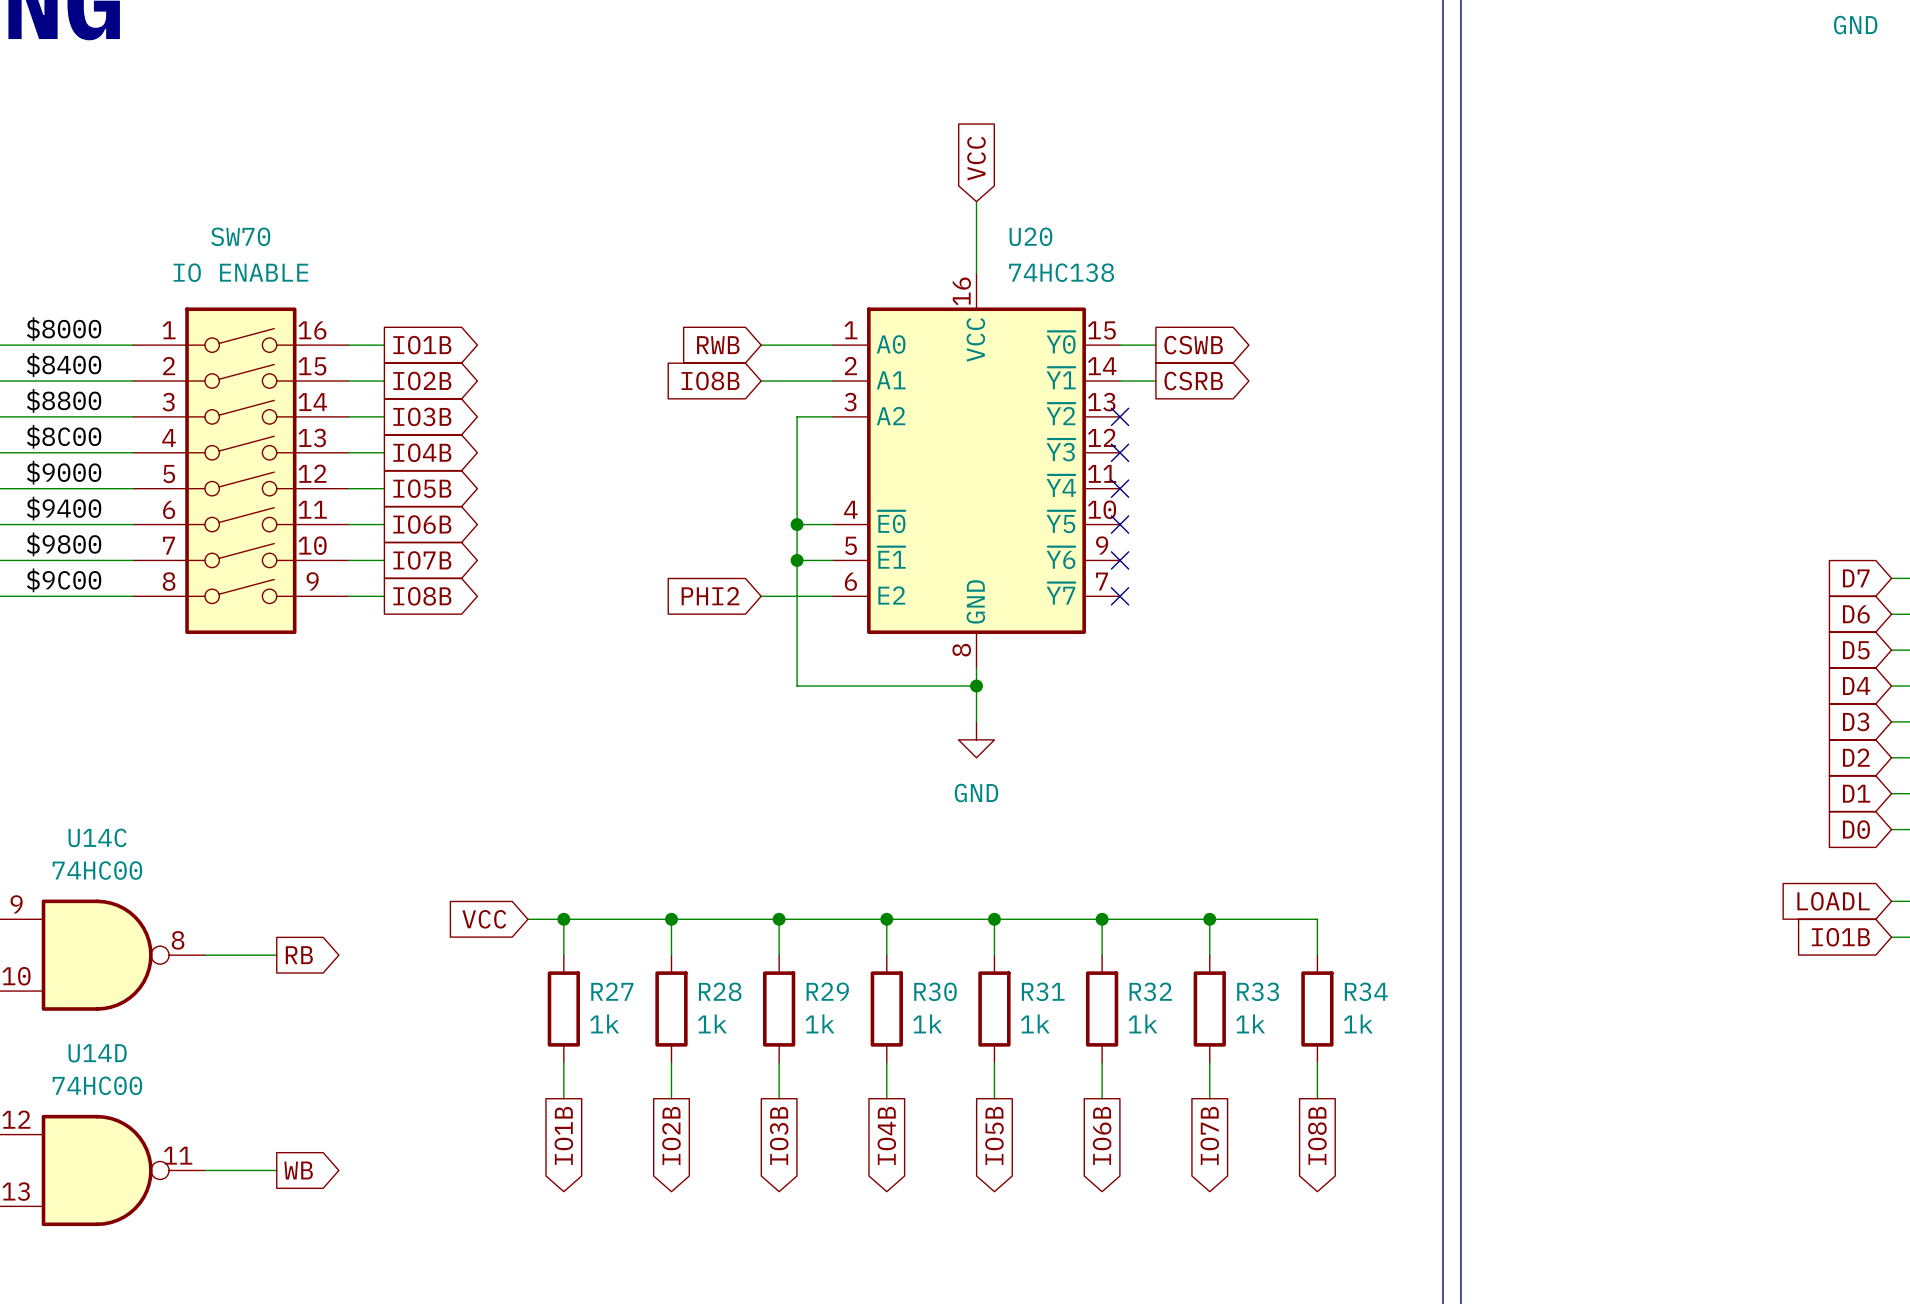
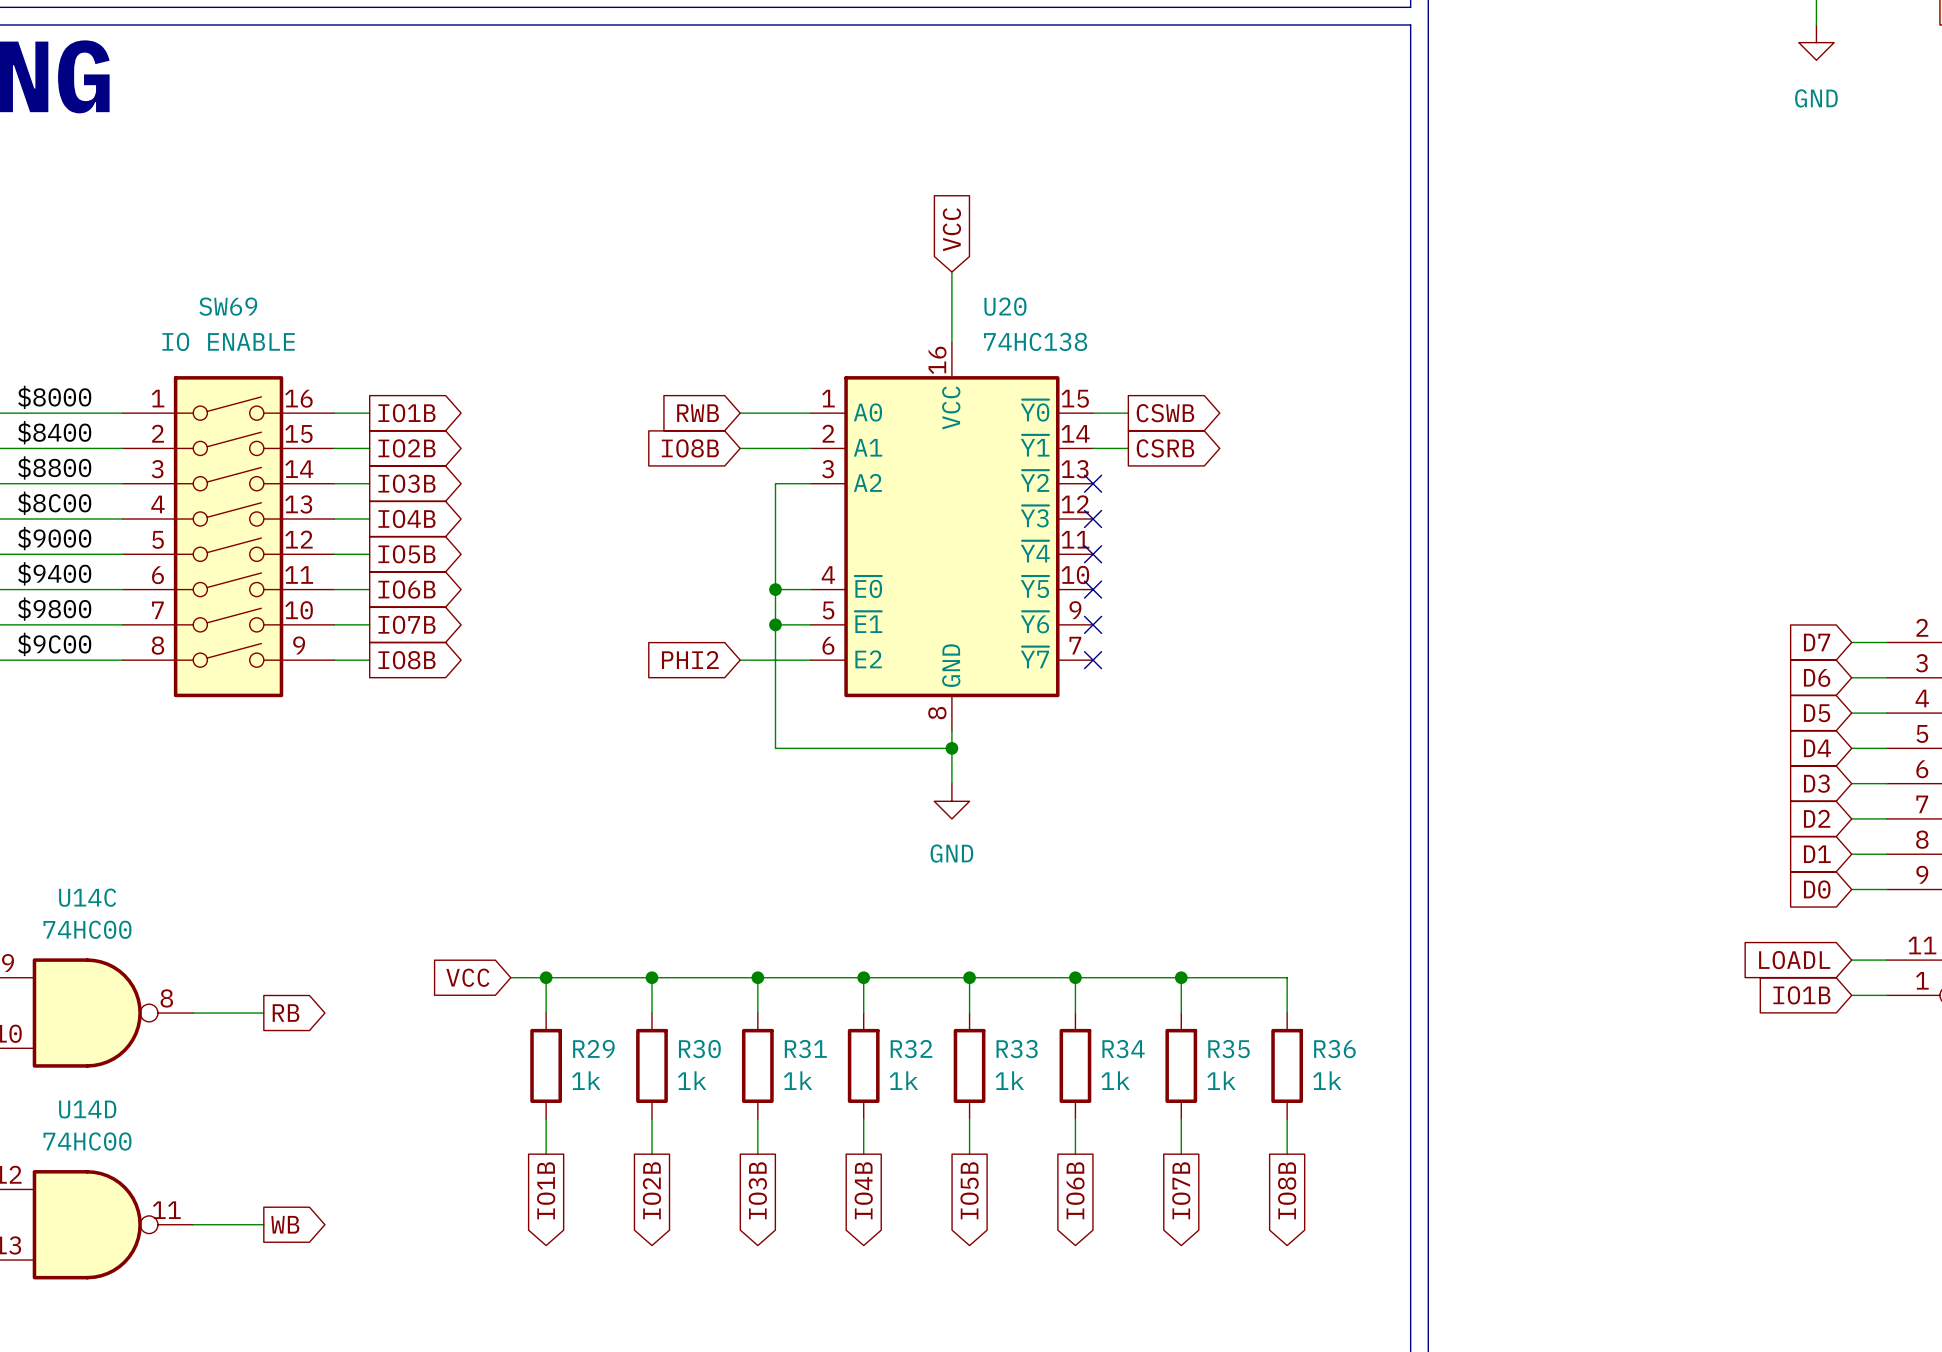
SW70 name: SW70 (240, 236) -> SW69 (228, 306)
R27 name: R27 (612, 991) -> R29 (593, 1048)
R28 name: R28 (720, 991) -> R30 (699, 1049)
R29 name: R29 (827, 991) -> R31 (805, 1049)
R30 name: R30 (935, 991) -> R32 (911, 1049)
R31 name: R31 (1043, 991) -> R33 (1017, 1049)
R32 name: R32 (1150, 991) -> R34 (1123, 1049)
R33 name: R33 (1258, 991) -> R35 (1229, 1049)
R34 name: R34 (1366, 991) -> R36 (1334, 1049)

